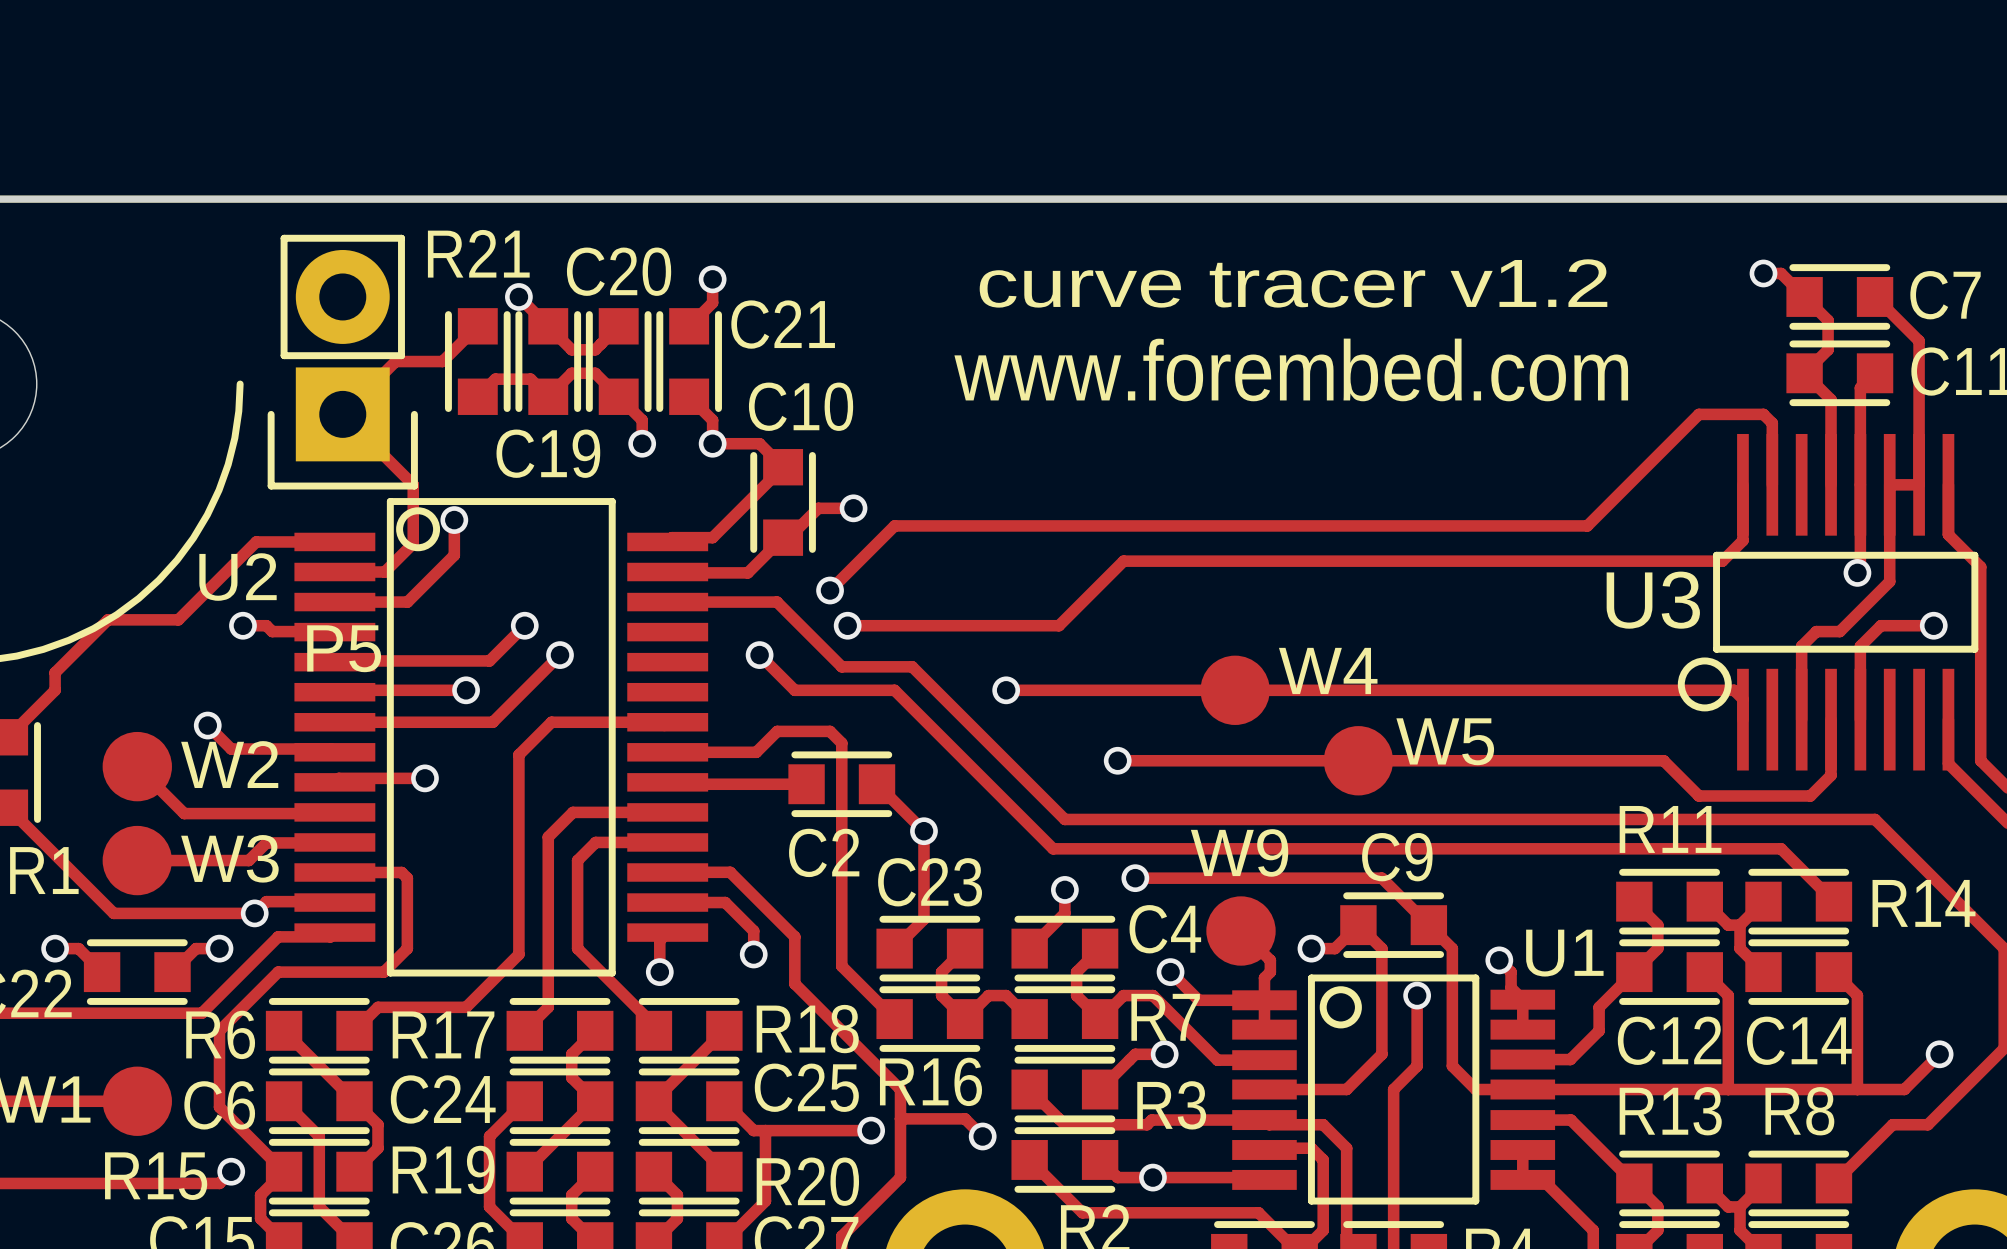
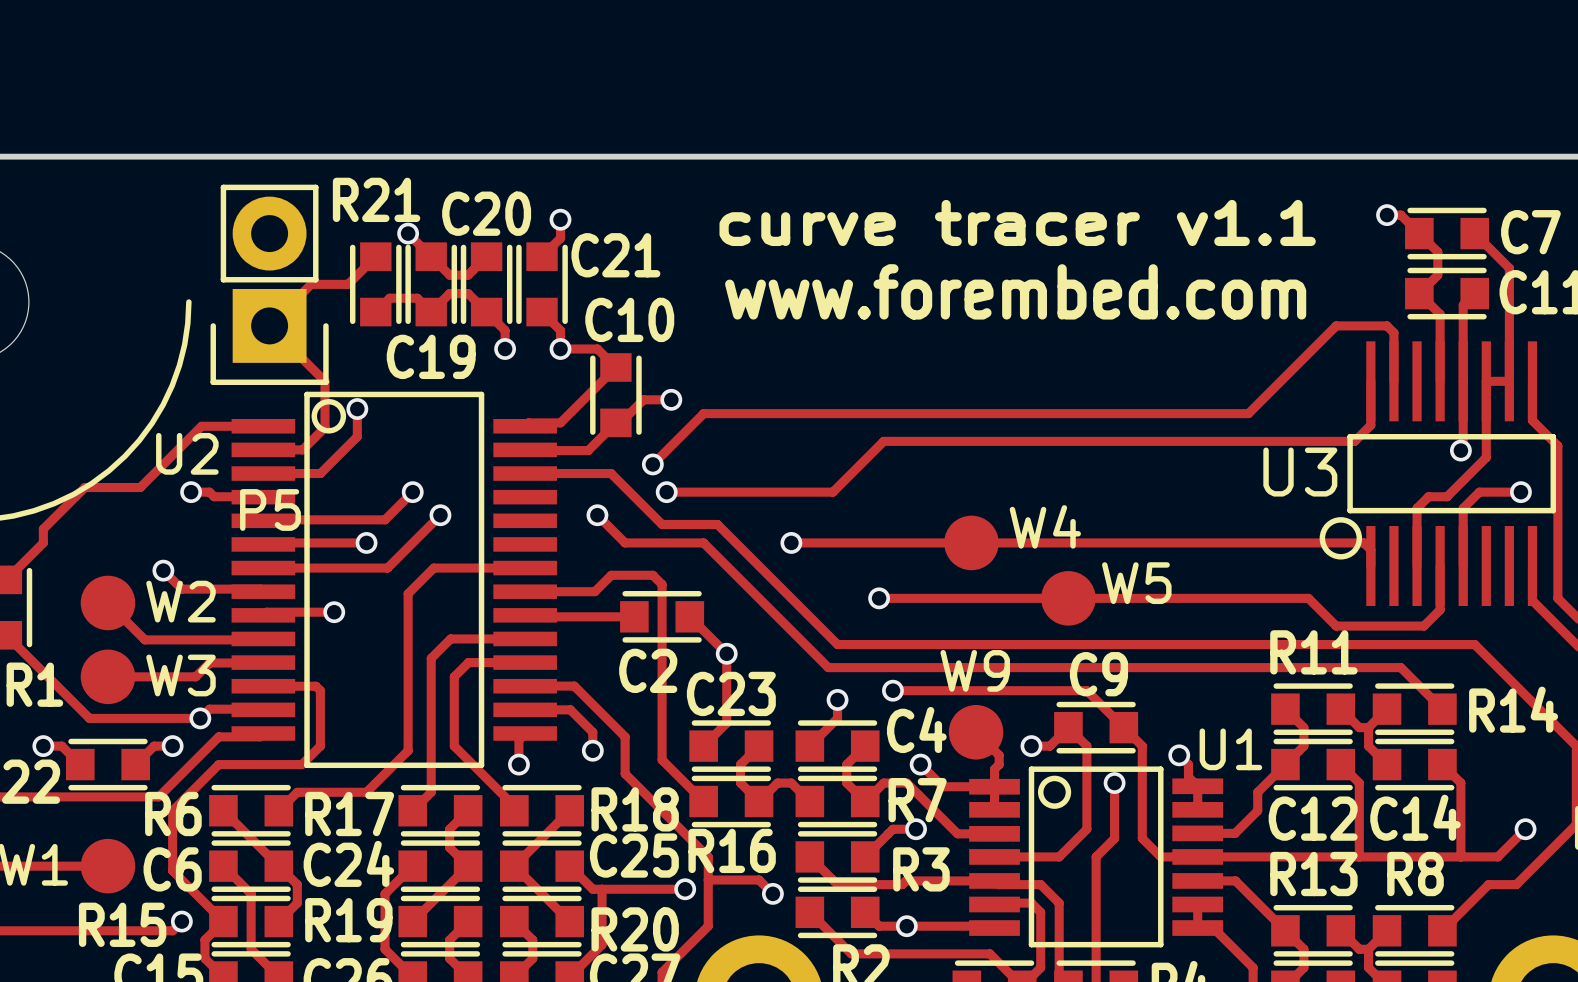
text: curve tracer v1.2 (1293, 283) -> curve tracer v1.1 (1017, 222)

